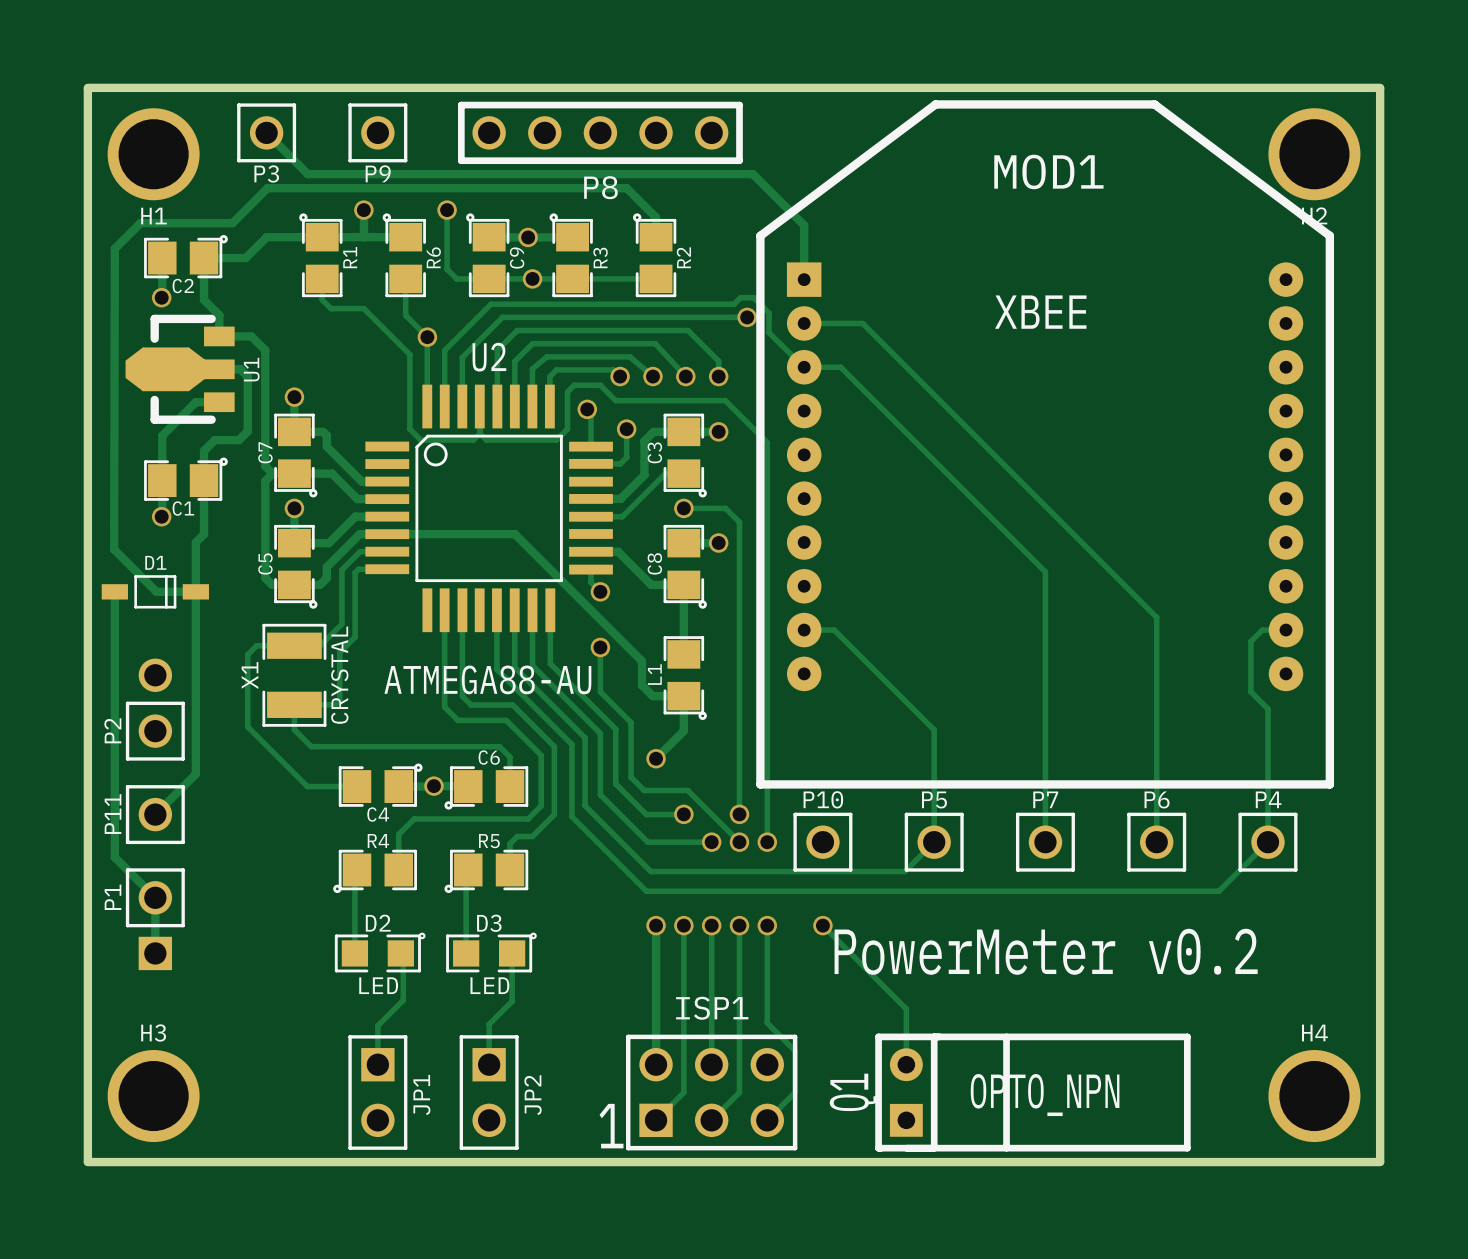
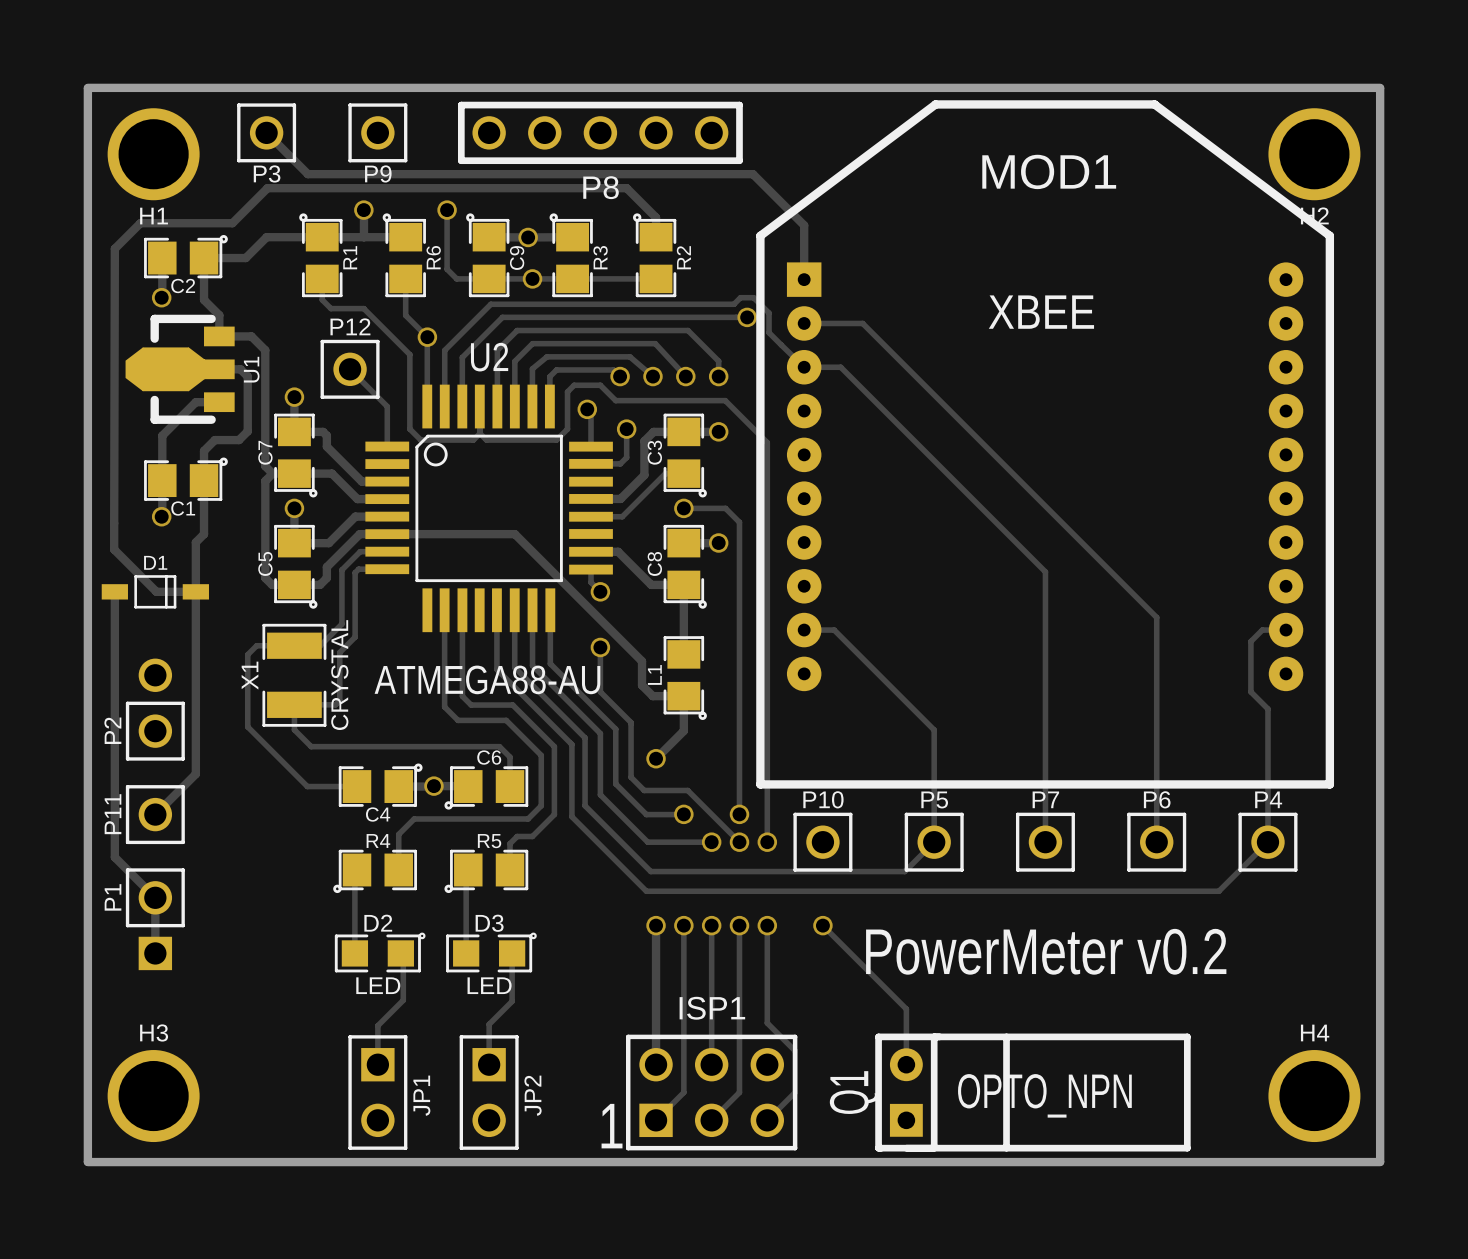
track: none -> (350, 369) (387, 406) (387, 446)
P12: none -> (350, 369)

